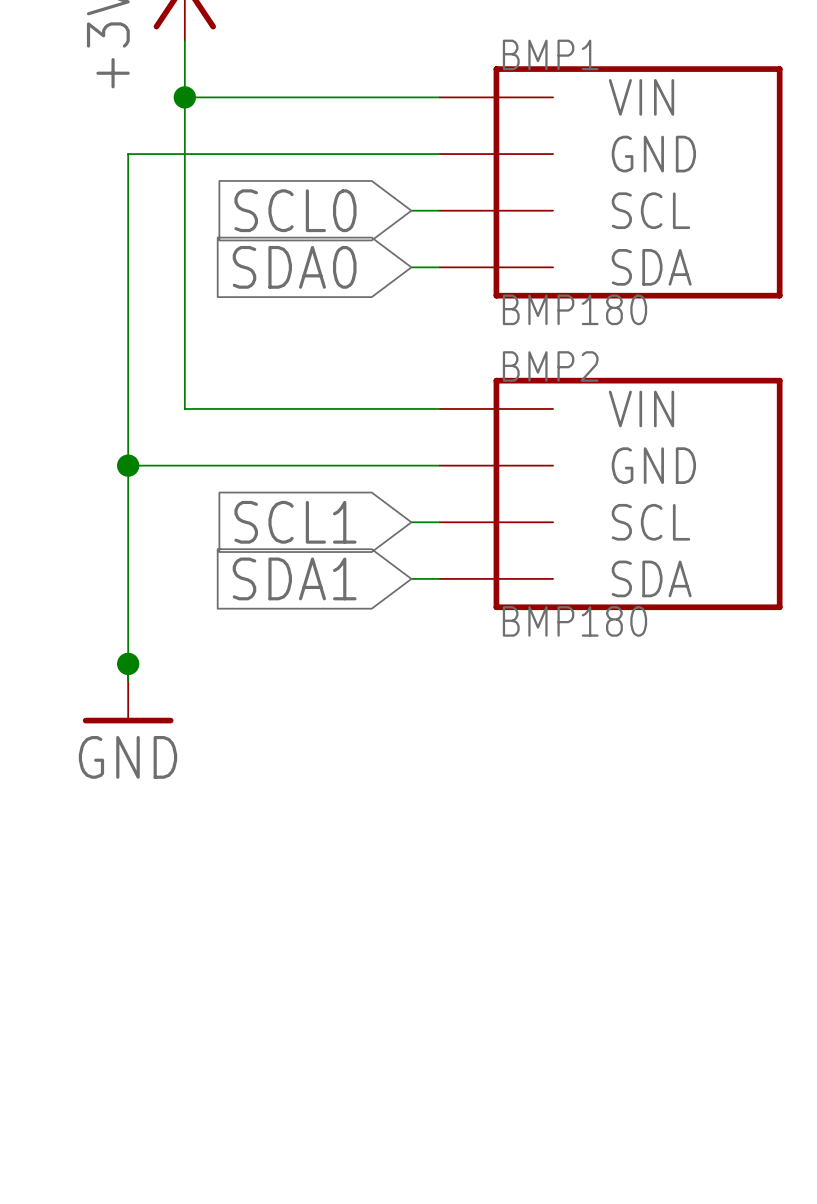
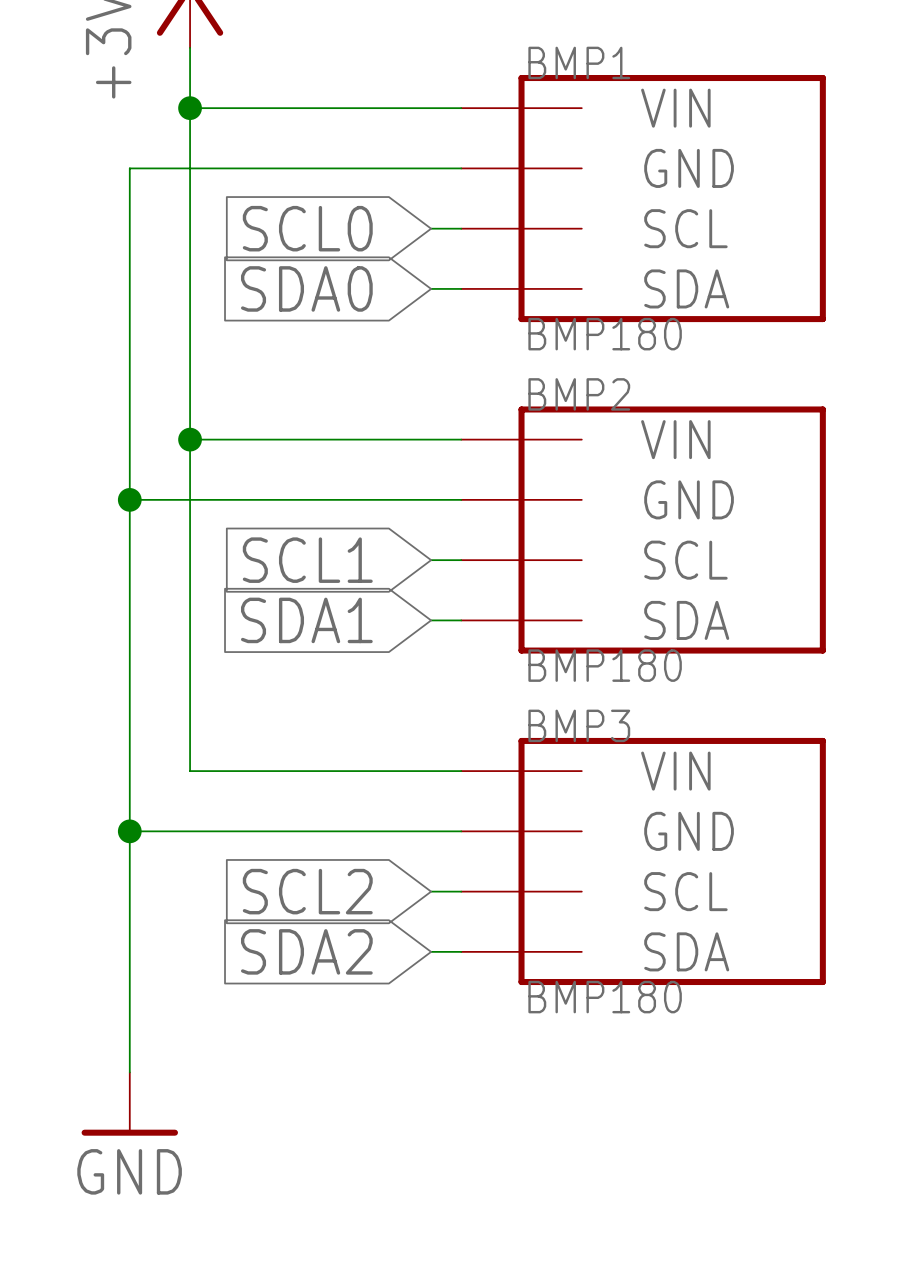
wire: none -> (190, 439) (190, 771) (461, 771)
junction: none -> (190, 439)
junction position: (128, 663) -> (129, 831)
wire: none -> (129, 728) (129, 1072)
power symbol position: GND (128, 693) -> GND (129, 1104)
wire: none -> (129, 831) (461, 831)
BMP3: none -> BMP180 (643, 861)
global label: none -> SCL2 (307, 891)
wire: none -> (431, 891) (461, 891)
global label: none -> SDA2 (306, 951)
wire: none -> (431, 951) (461, 951)

